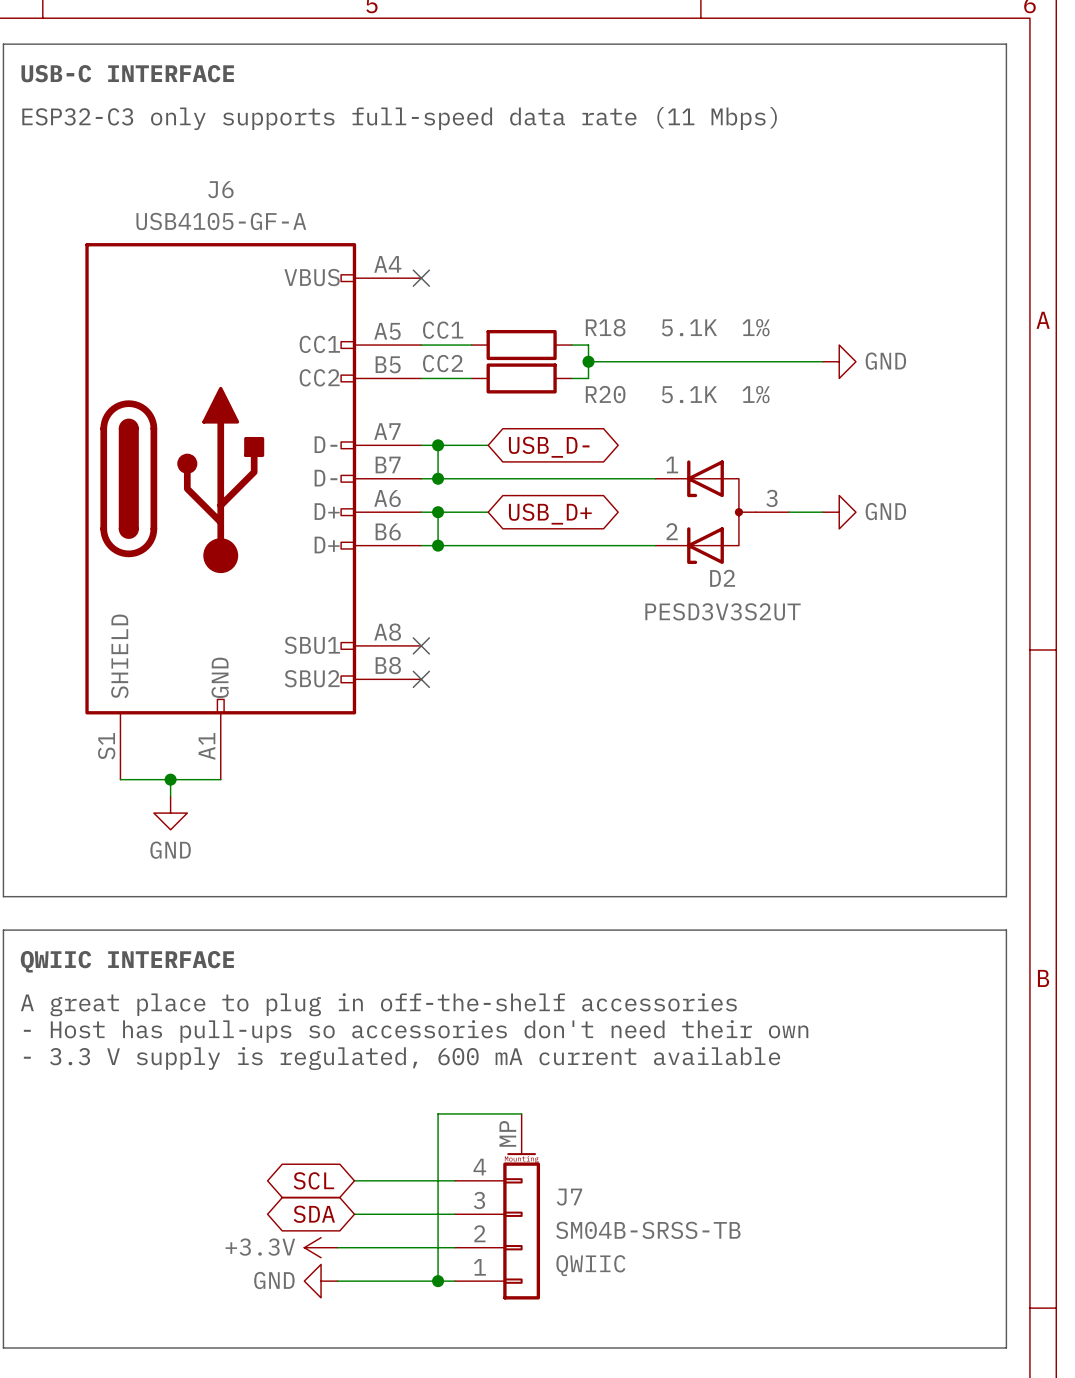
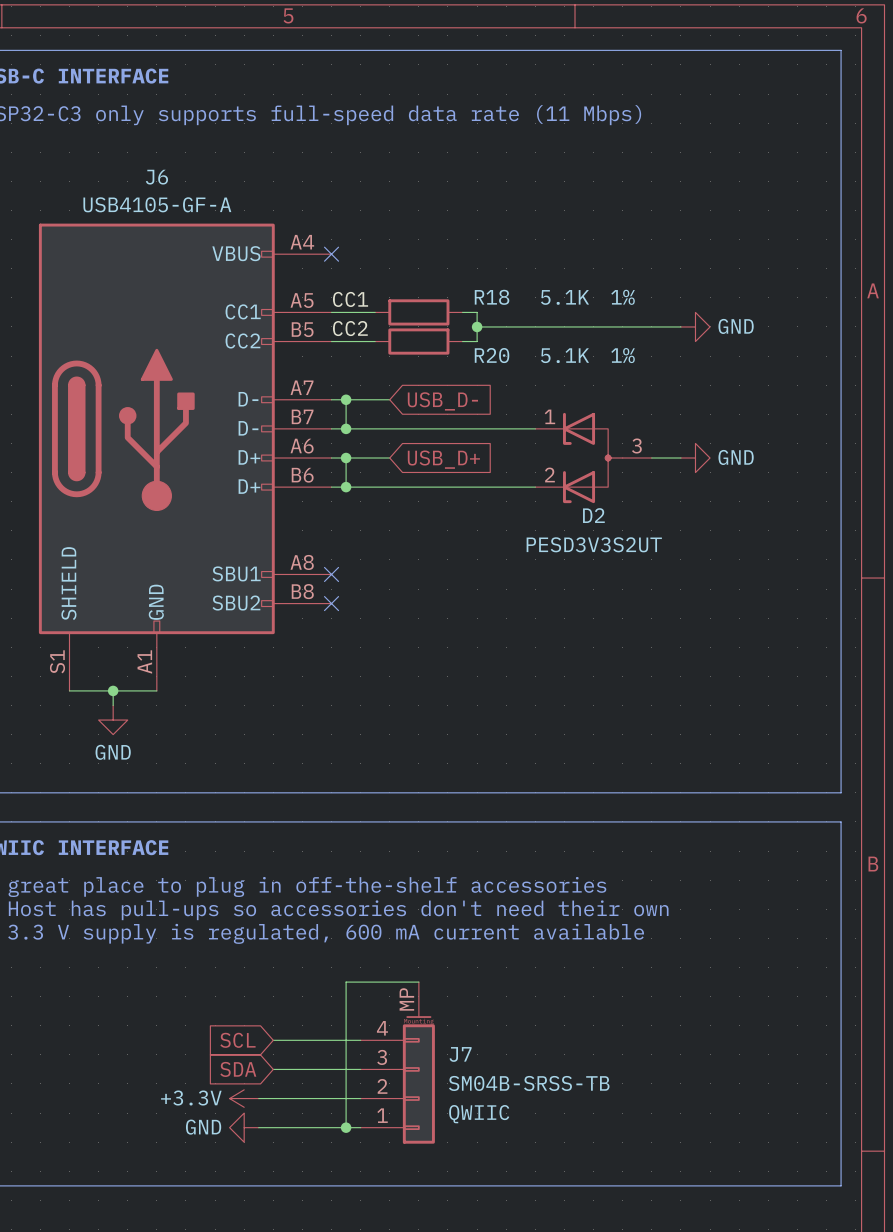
global label shape: bidirectional (549, 447) -> input (442, 401)
global label shape: bidirectional (550, 514) -> input (443, 459)
global label shape: bidirectional (313, 1180) -> input (237, 1040)
global label shape: bidirectional (314, 1214) -> input (238, 1069)

